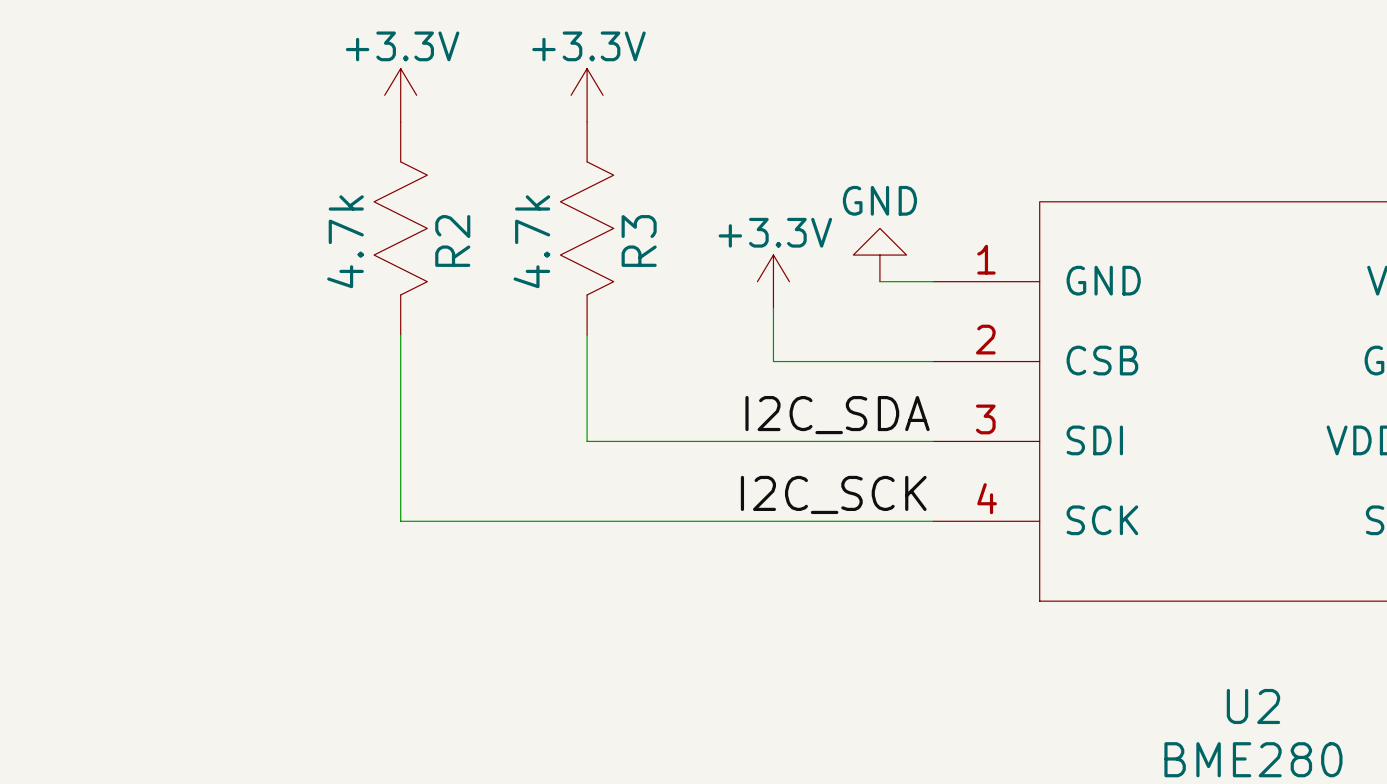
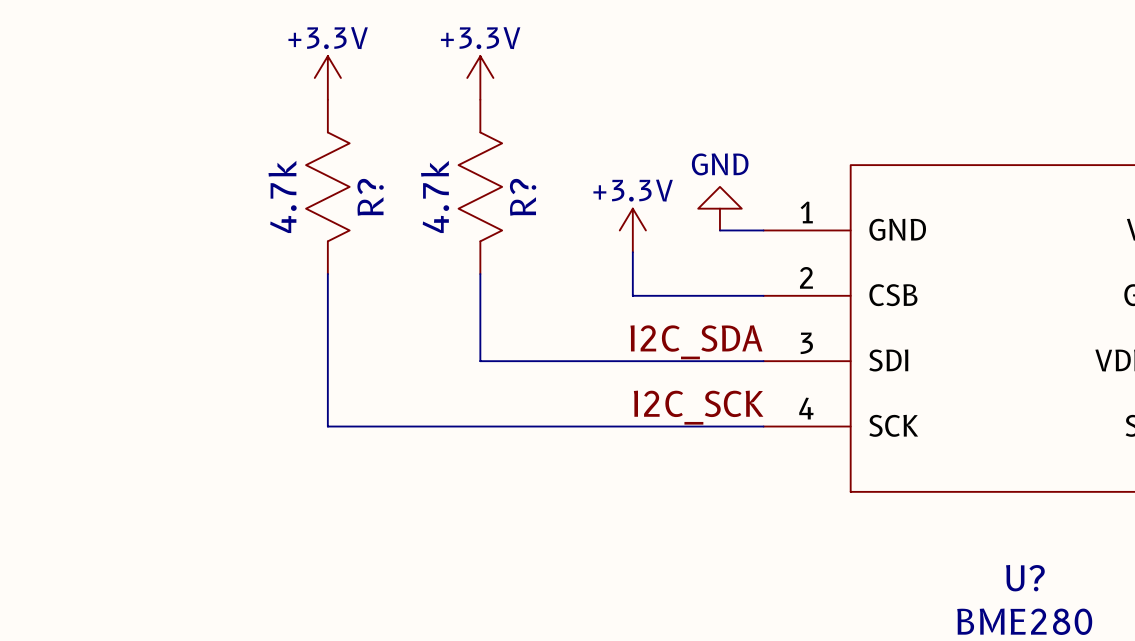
R2 name: R2 (452, 240) -> R? (370, 197)
R3 name: R3 (639, 240) -> R? (523, 197)
U2 name: U2 (1253, 706) -> U? (1025, 578)

